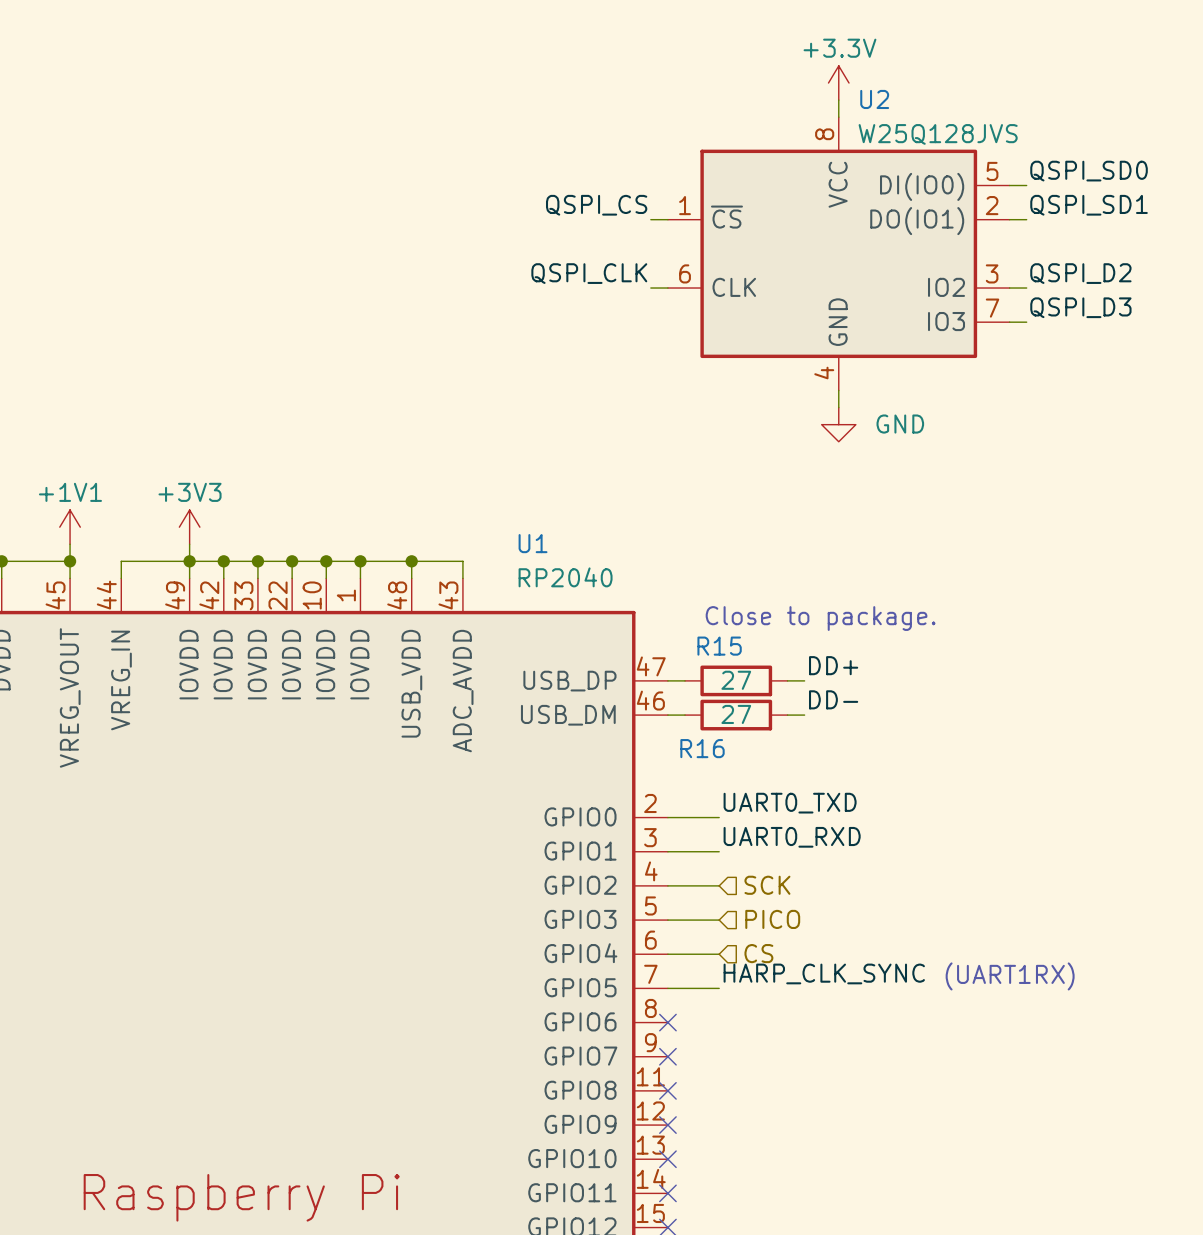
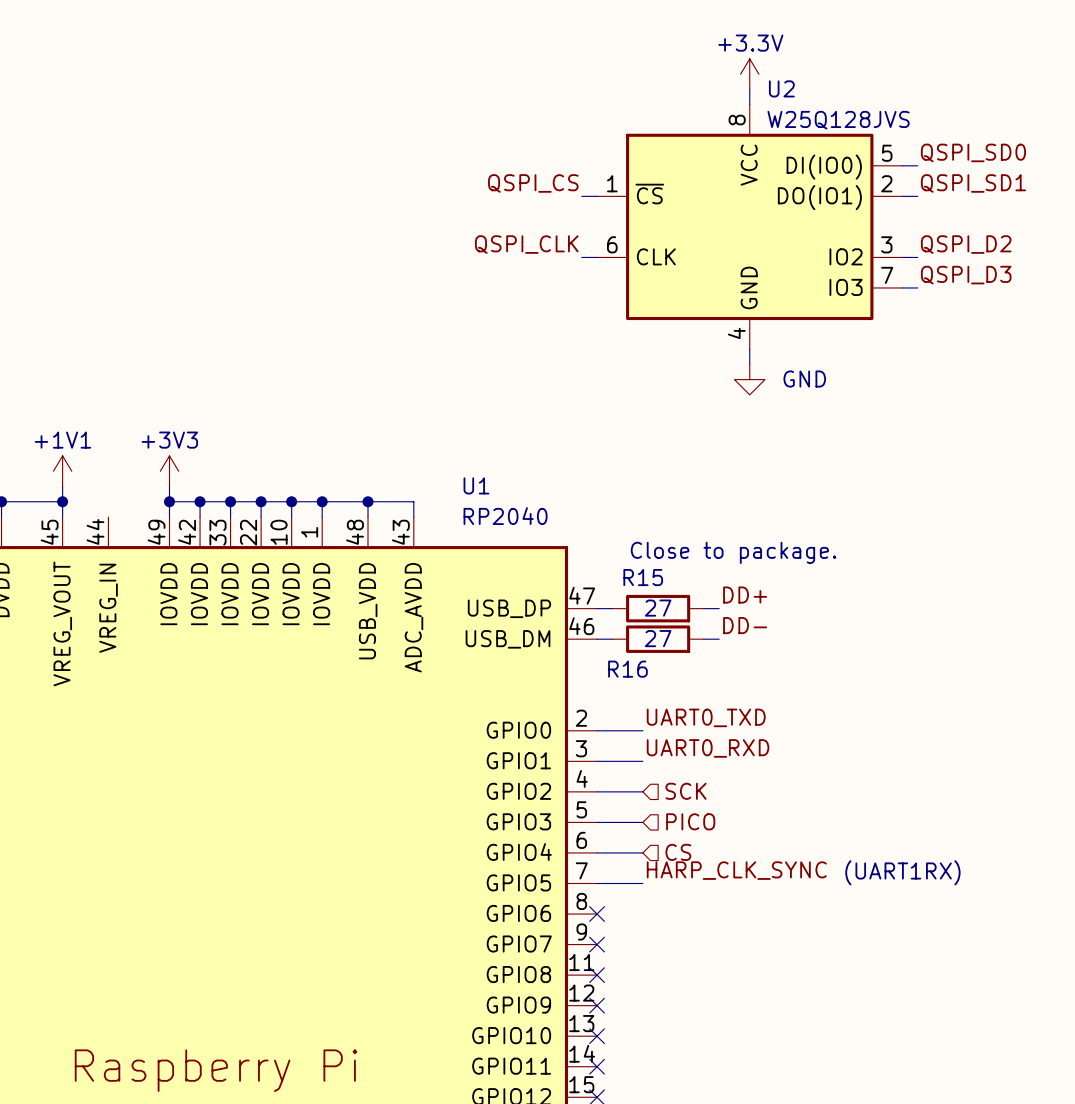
wire: (189, 561) (121, 561) (121, 578) -> none

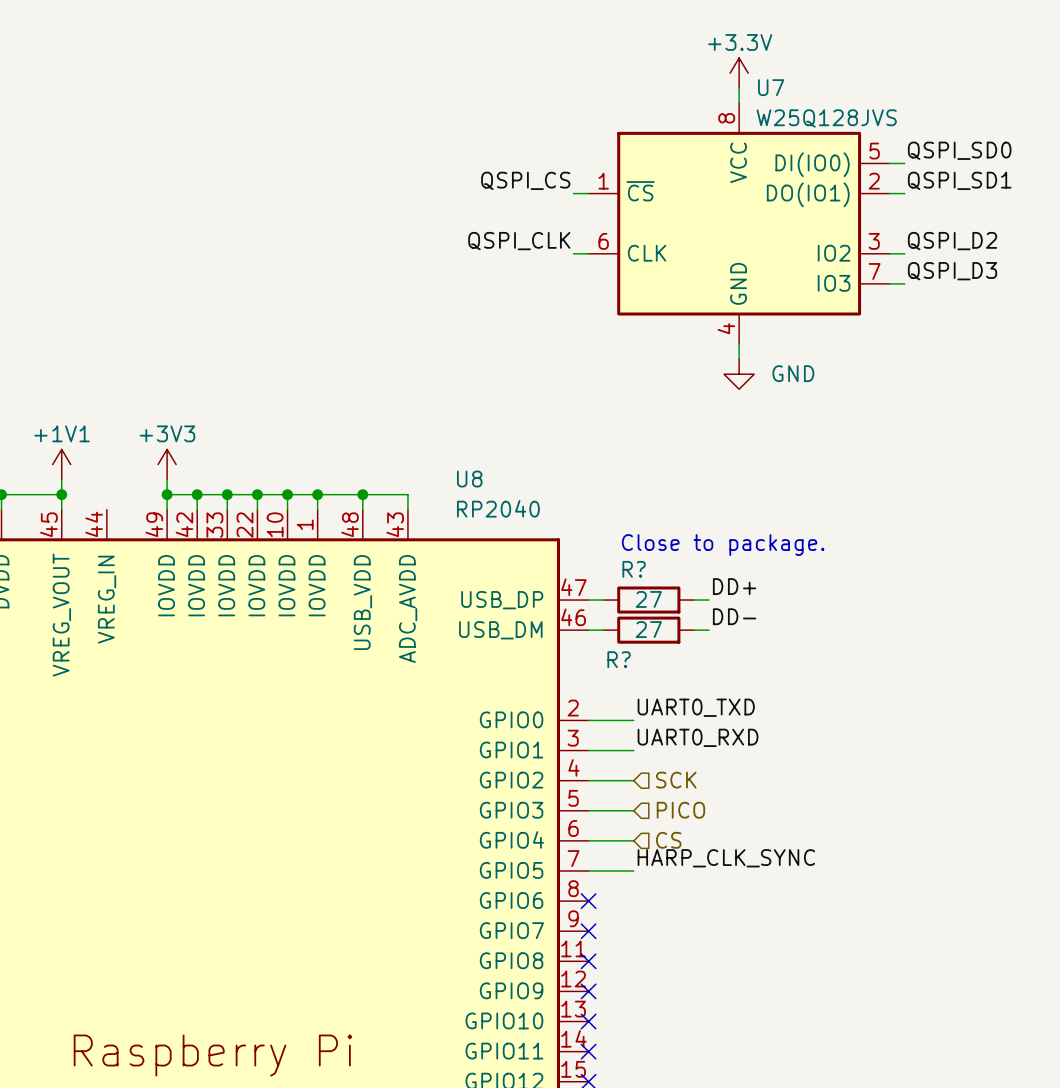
U2 name: U2 (781, 88) -> U7 (771, 87)
U1 name: U1 (476, 485) -> U8 (469, 479)
R15 name: R15 (643, 577) -> R? (634, 569)
R16 name: R16 (627, 669) -> R? (619, 659)
text: (UART1RX) (902, 872) -> none

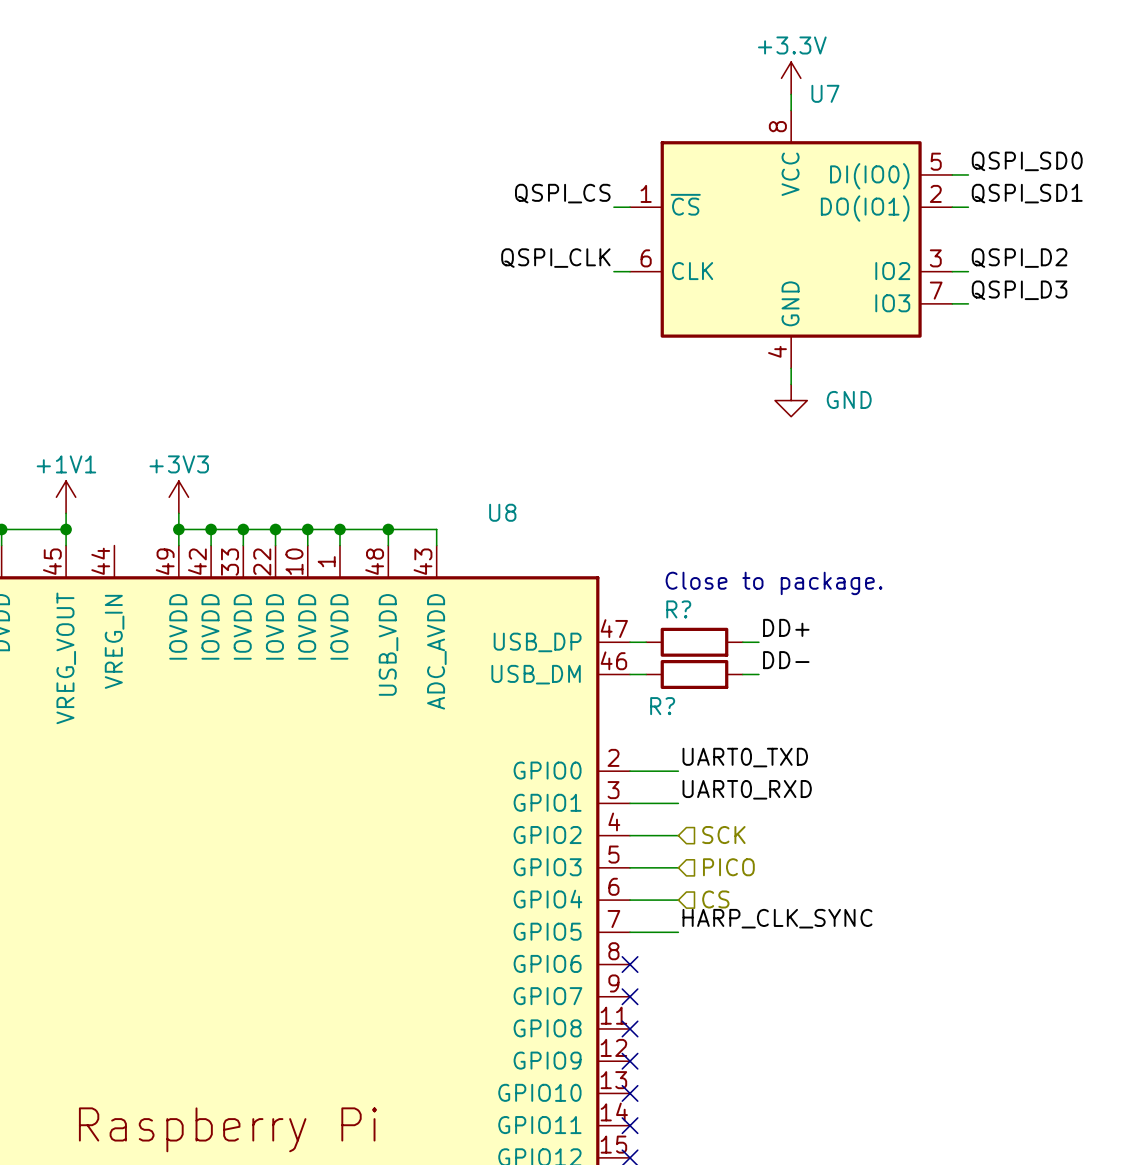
U7 value: W25Q128JVS (826, 118) -> none
U8 value: RP2040 (498, 508) -> none
R? value: 27 (648, 599) -> none
R? value: 27 (648, 629) -> none

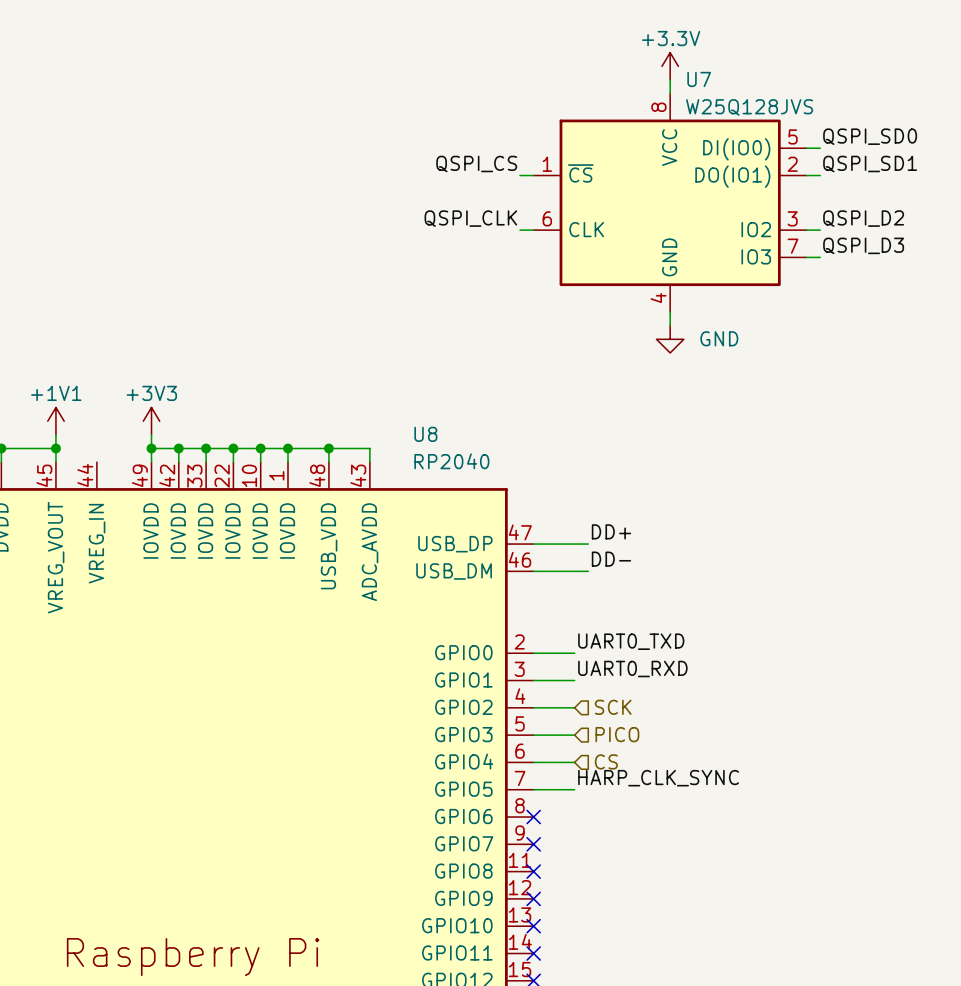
U7 value: none -> W25Q128JVS (749, 107)
U8 value: none -> RP2040 (451, 461)
text: Close to package. (774, 583) -> none
label position: DD+ (786, 627) -> DD+ (611, 531)
wire: none -> (547, 544) (588, 544)
R?: (694, 642) -> none
wire: (742, 642) (758, 642) -> none
label position: DD- (786, 660) -> DD- (611, 559)
wire: none -> (547, 571) (588, 571)
R?: (694, 674) -> none
wire: (742, 674) (758, 674) -> none

